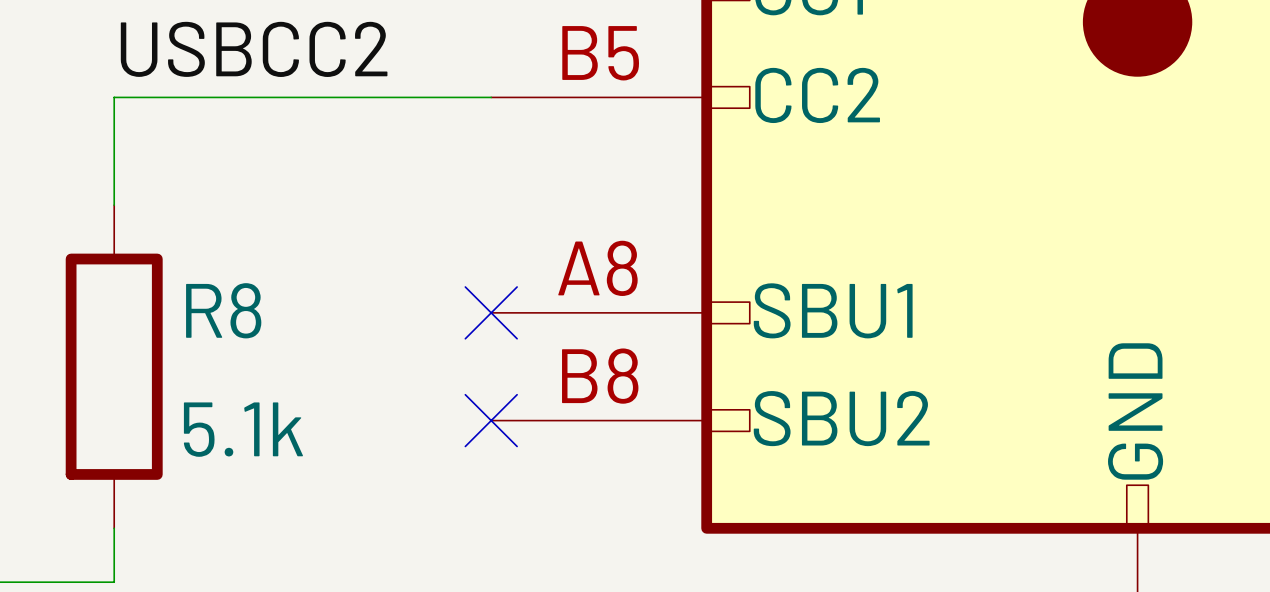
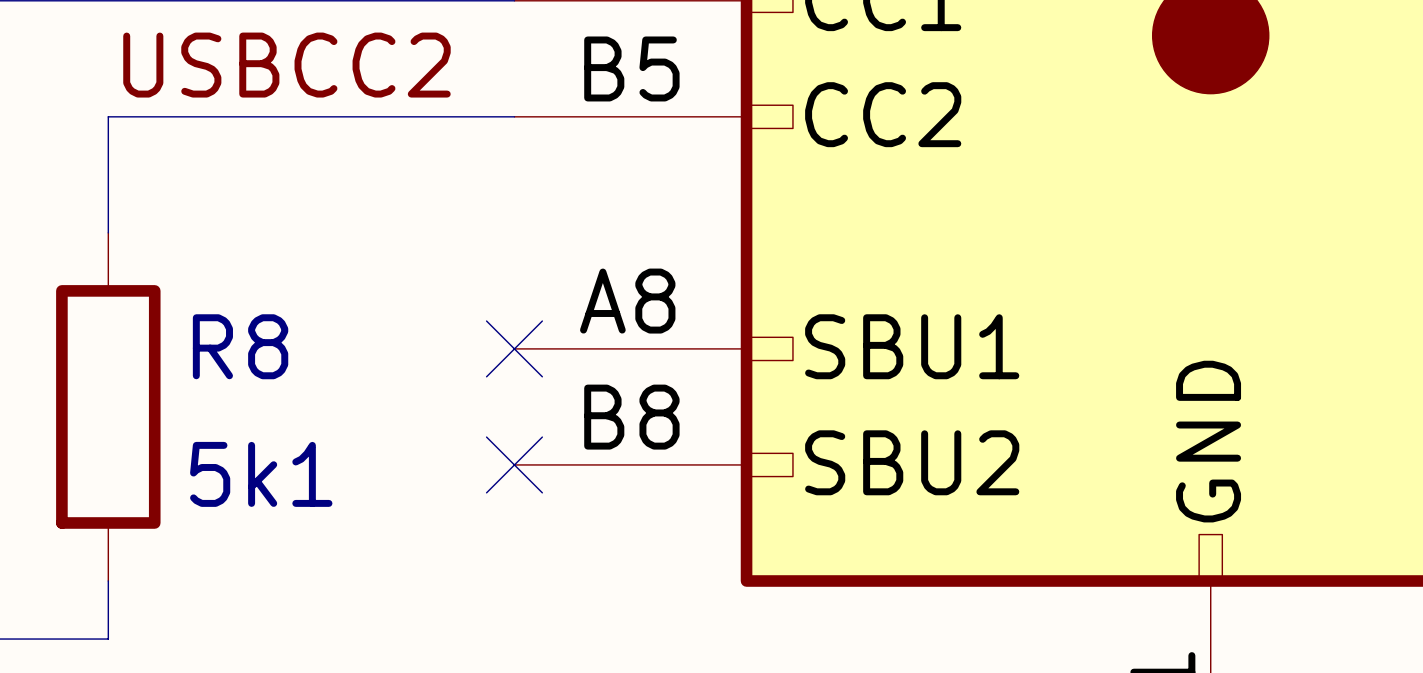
R8 value: 5.1k (243, 429) -> 5k1 (261, 474)

